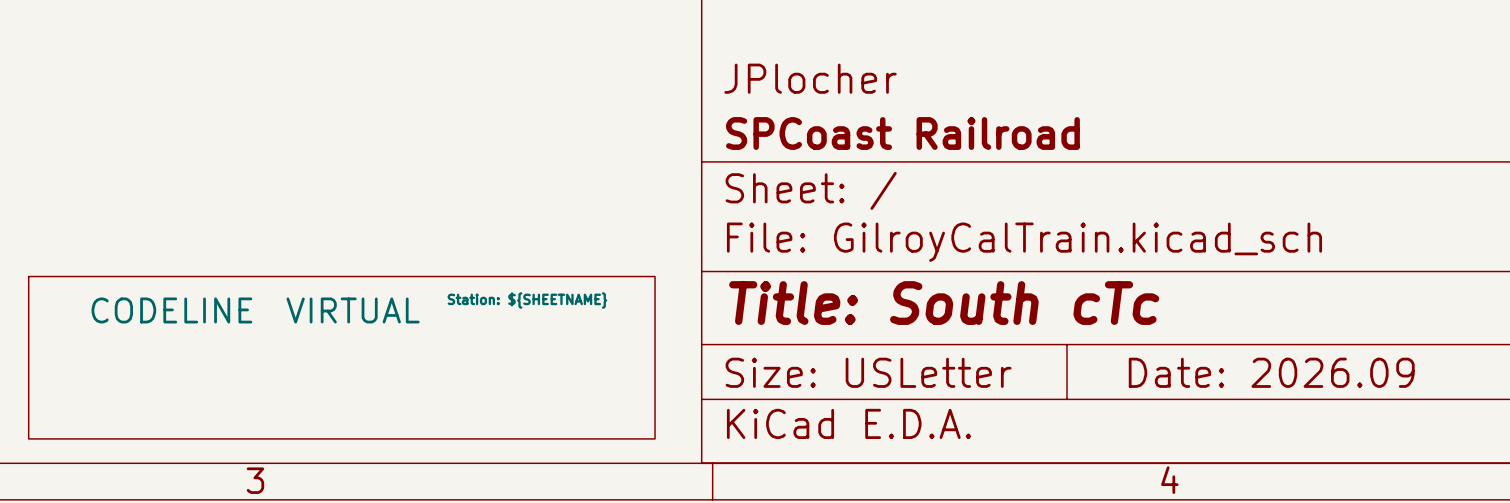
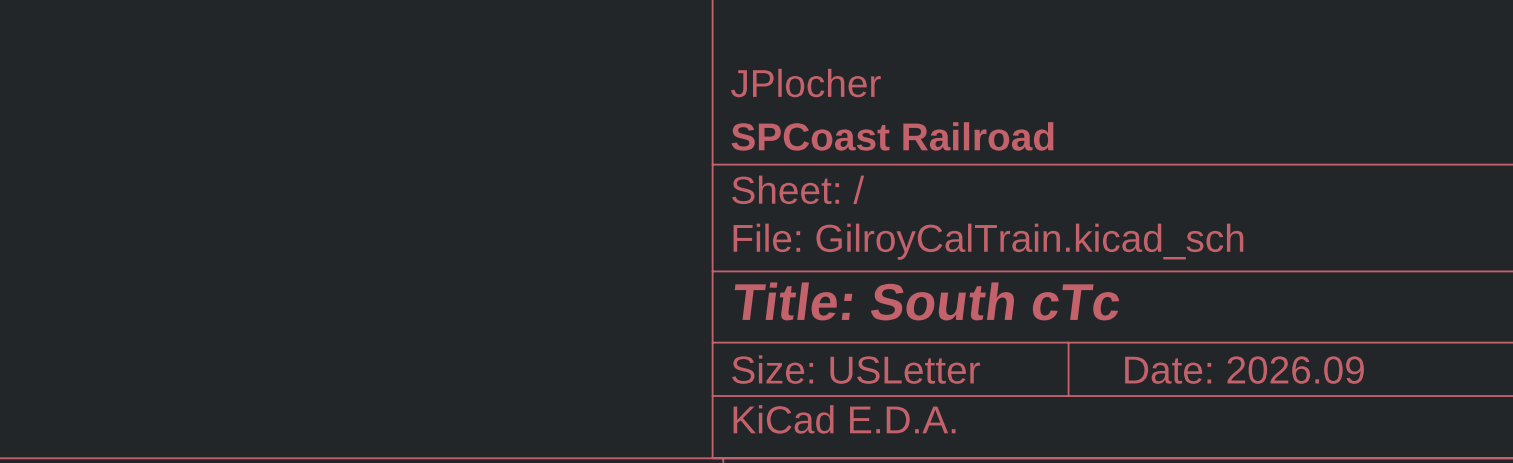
part: VIRTUAL (341, 357) -> none

